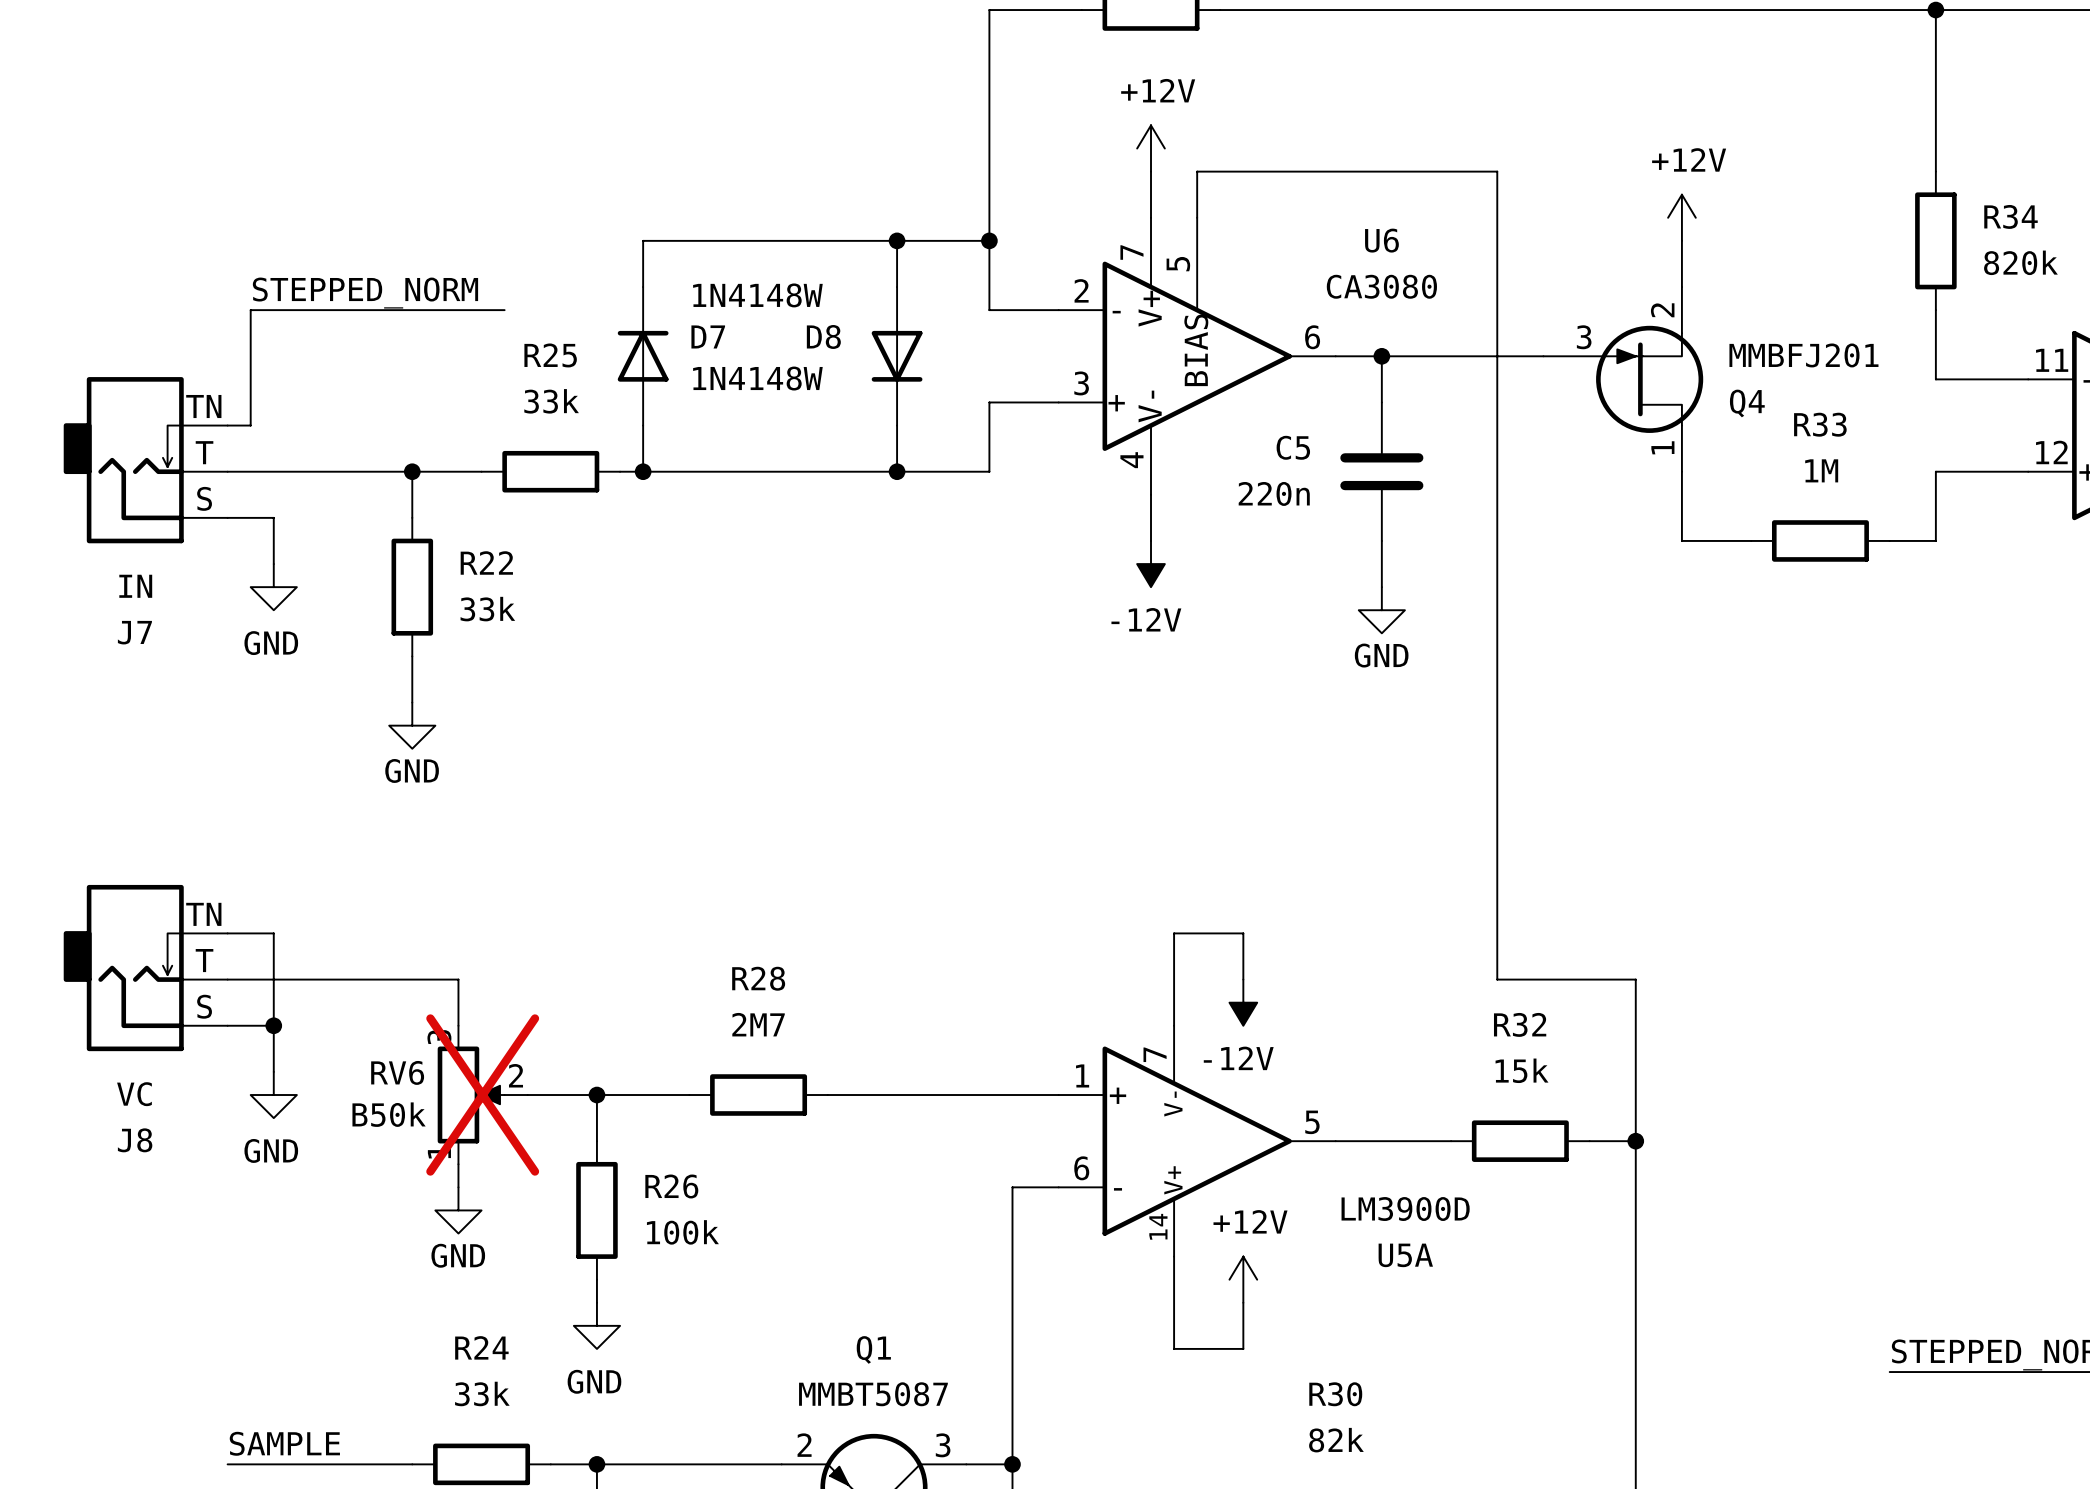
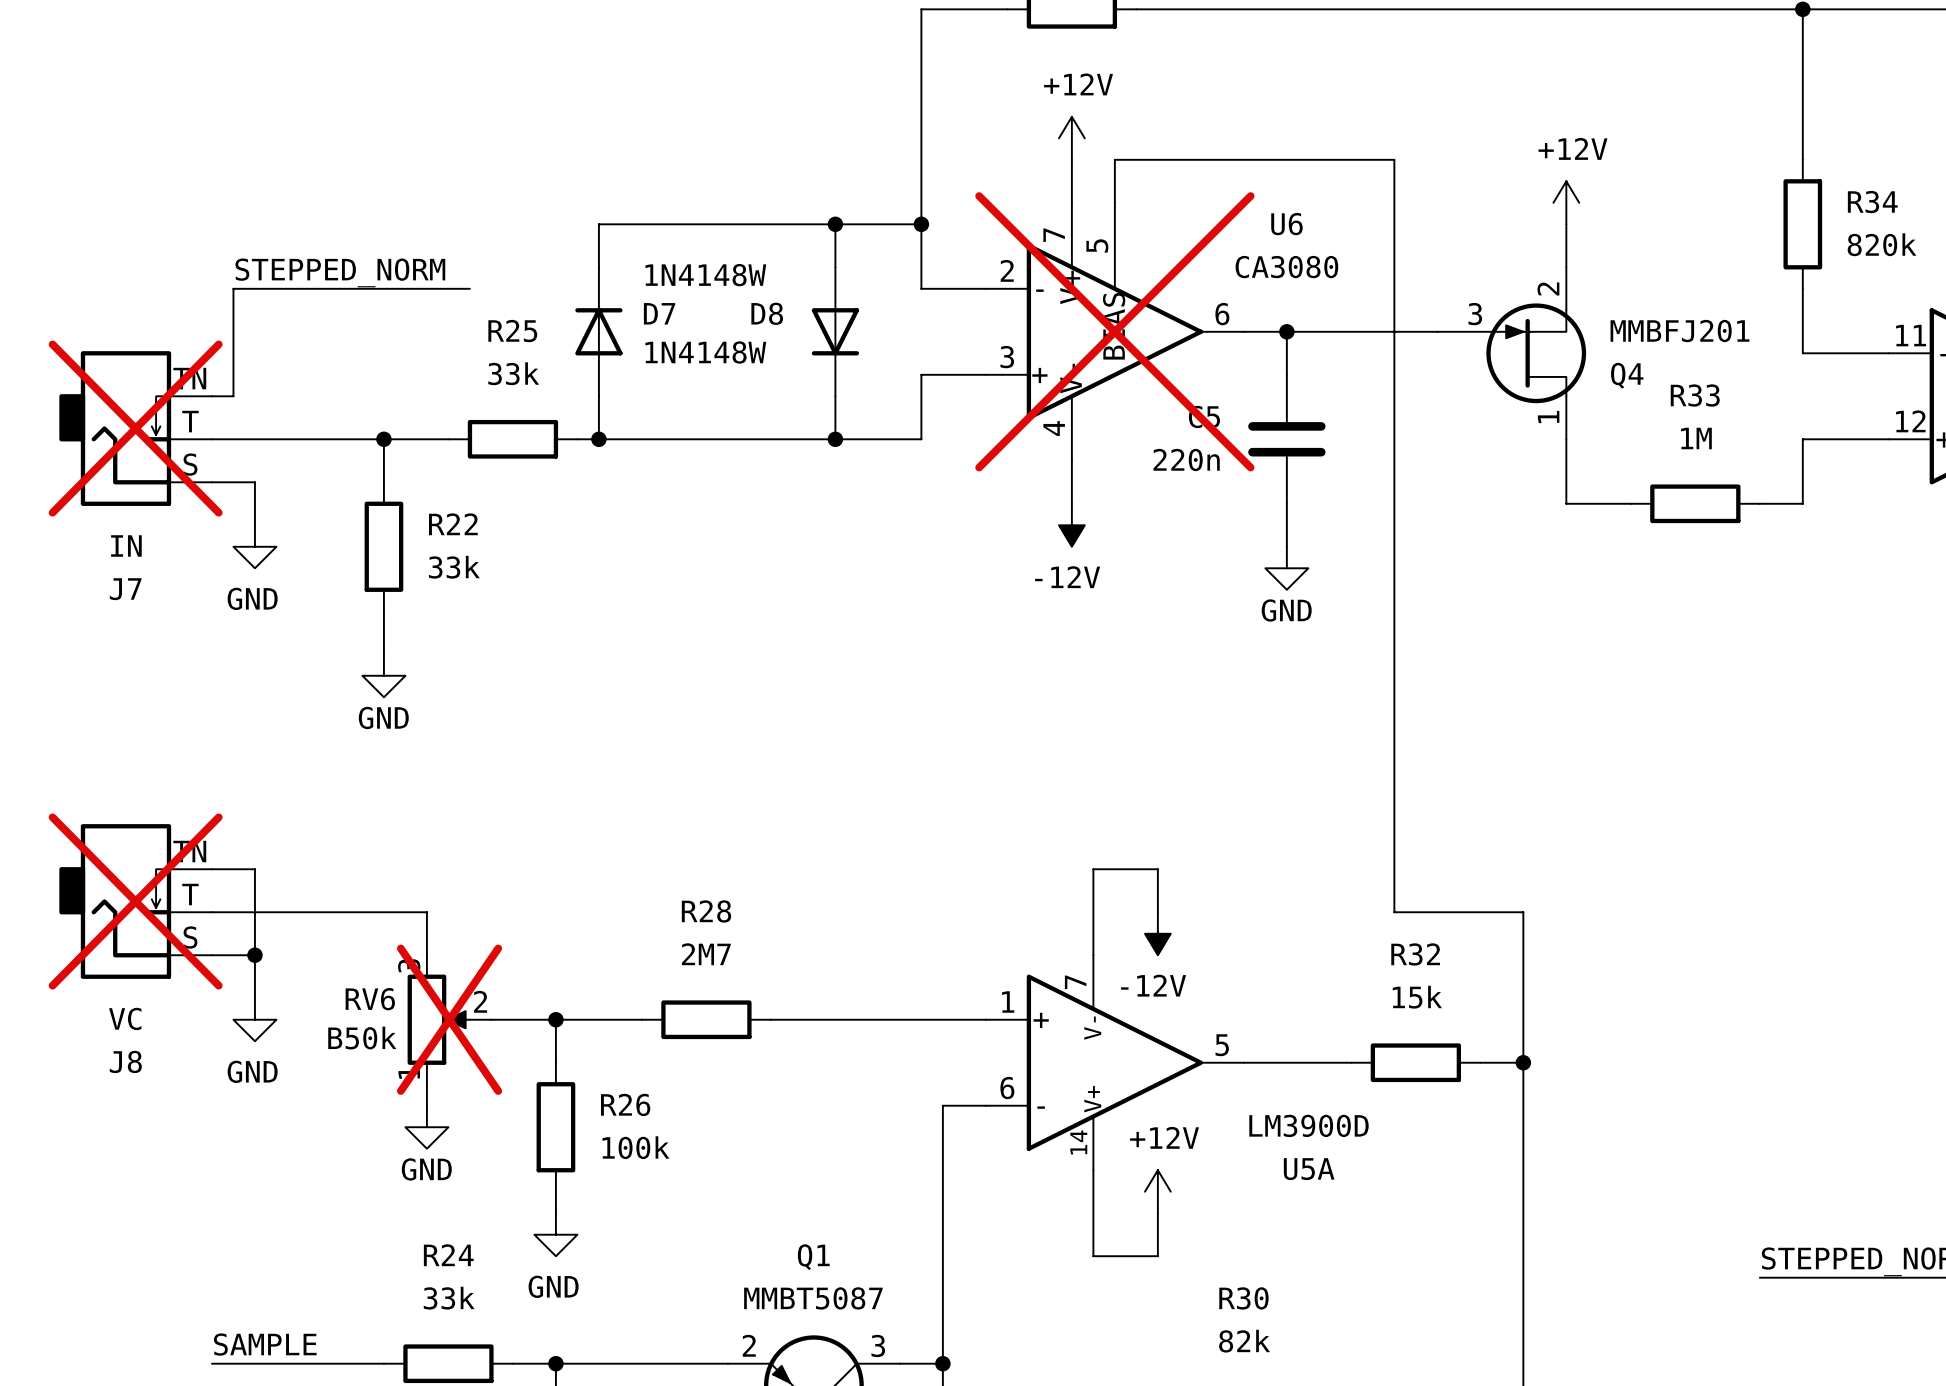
U6 do-not-place cross: none -> (1114, 331)
J7 do-not-place cross: none -> (135, 428)
J8 do-not-place cross: none -> (135, 901)

